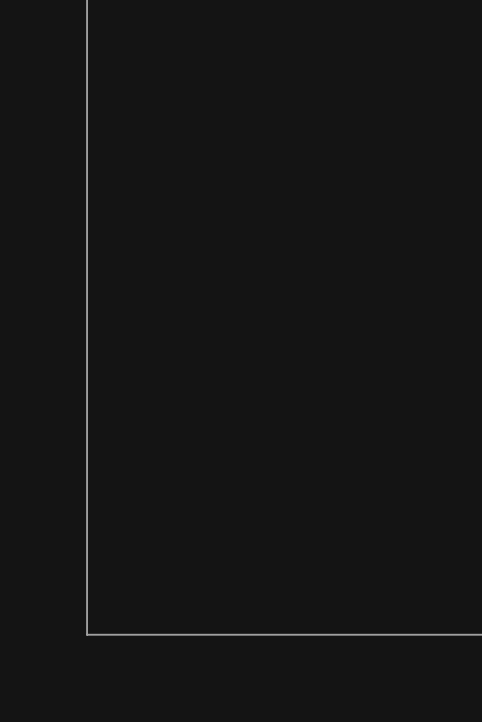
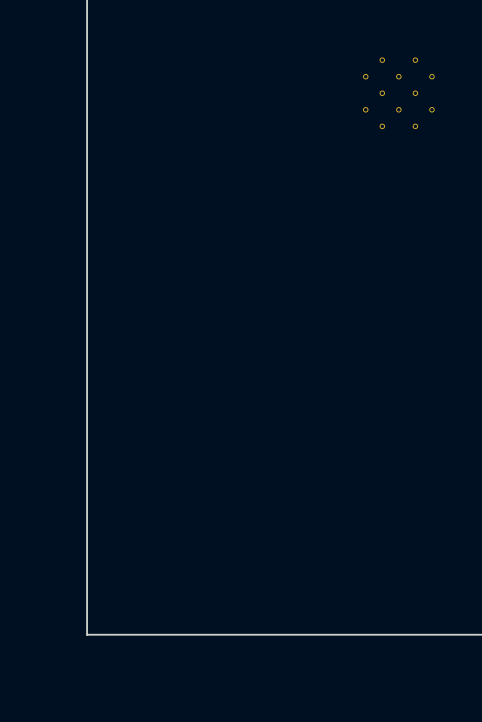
part: none -> (398, 93)

